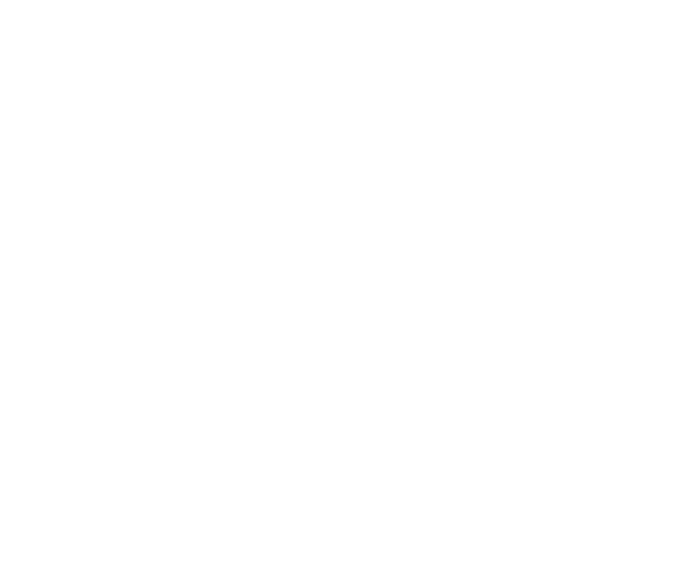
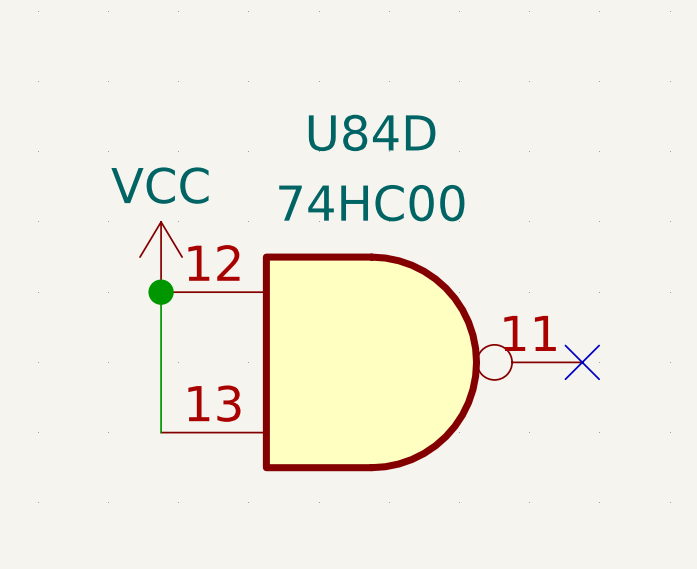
power symbol: none -> VCC (161, 257)
wire: none -> (161, 292) (161, 432)
junction: none -> (161, 292)
U84D: none -> 74HC00 (371, 362)
no-connect mark: none -> (582, 362)

